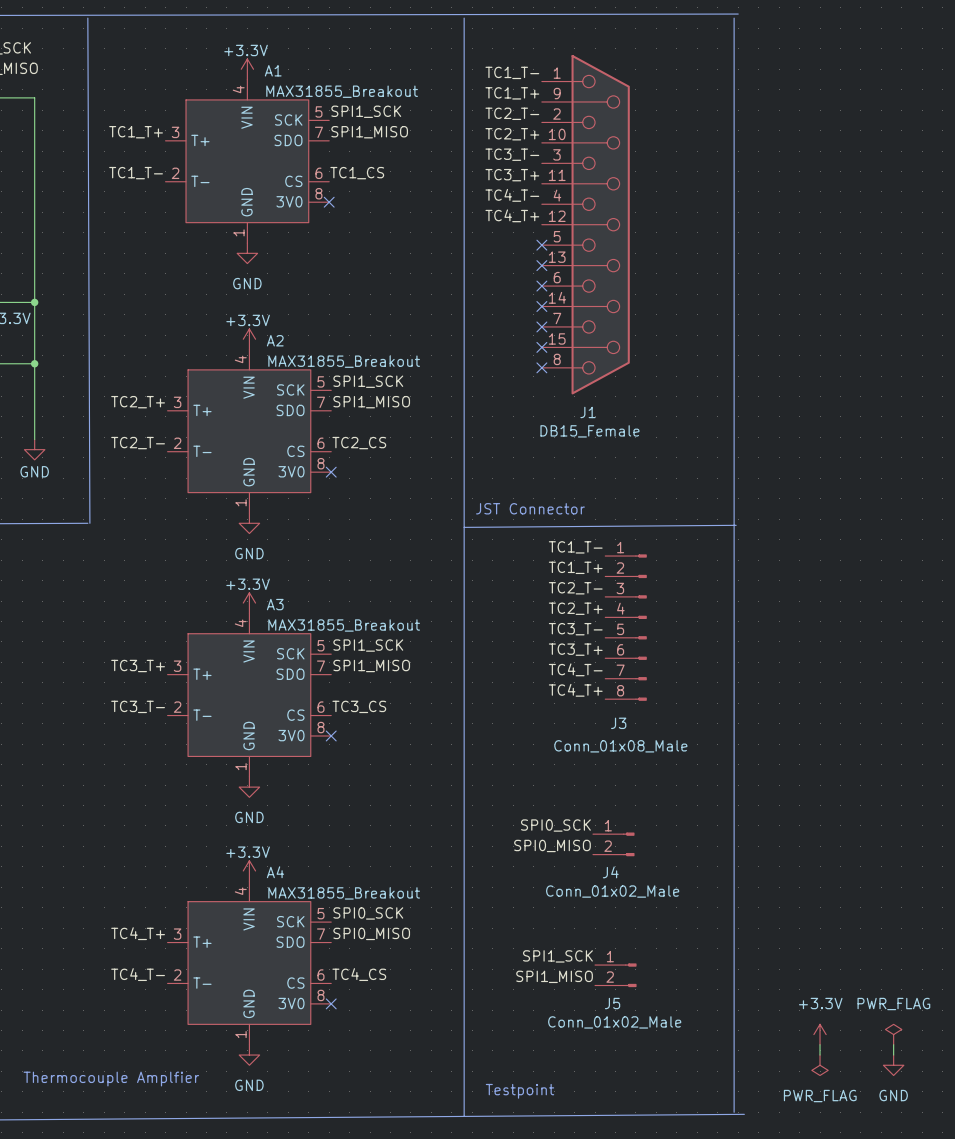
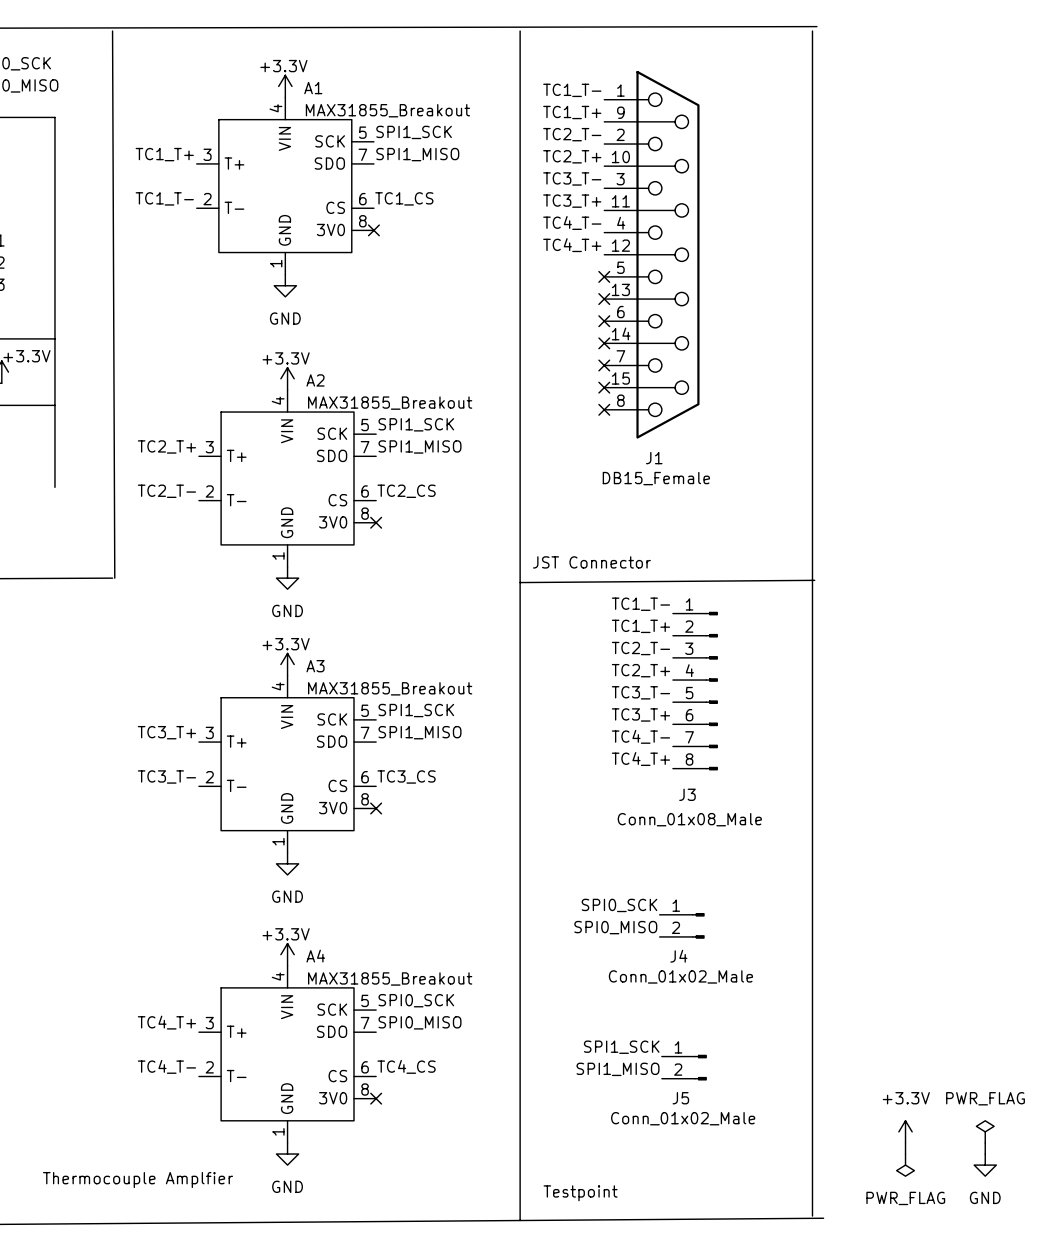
junction: (34, 302) -> none
junction: (34, 363) -> none
power symbol: GND (34, 449) -> none

